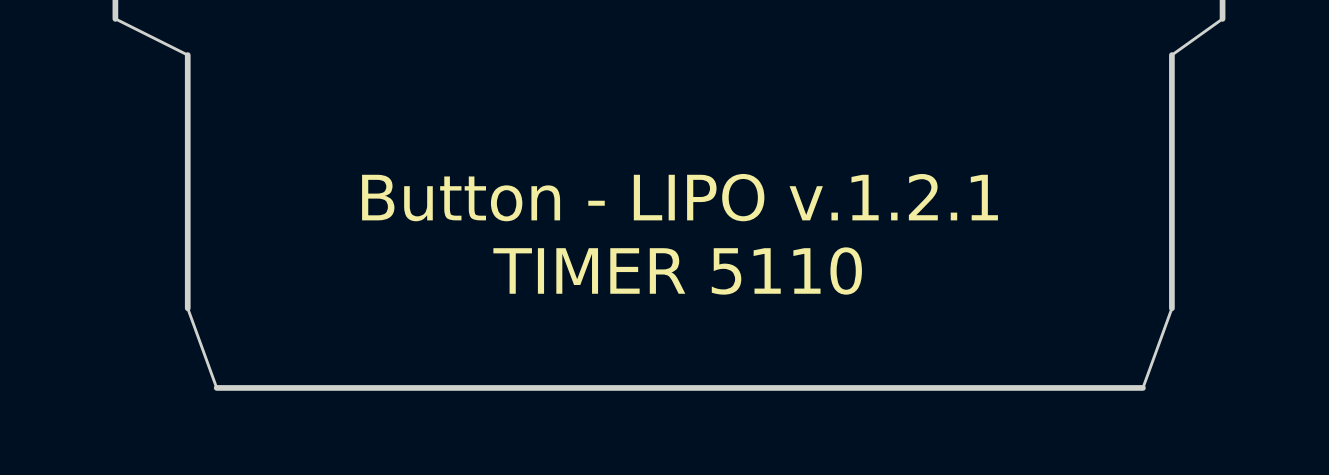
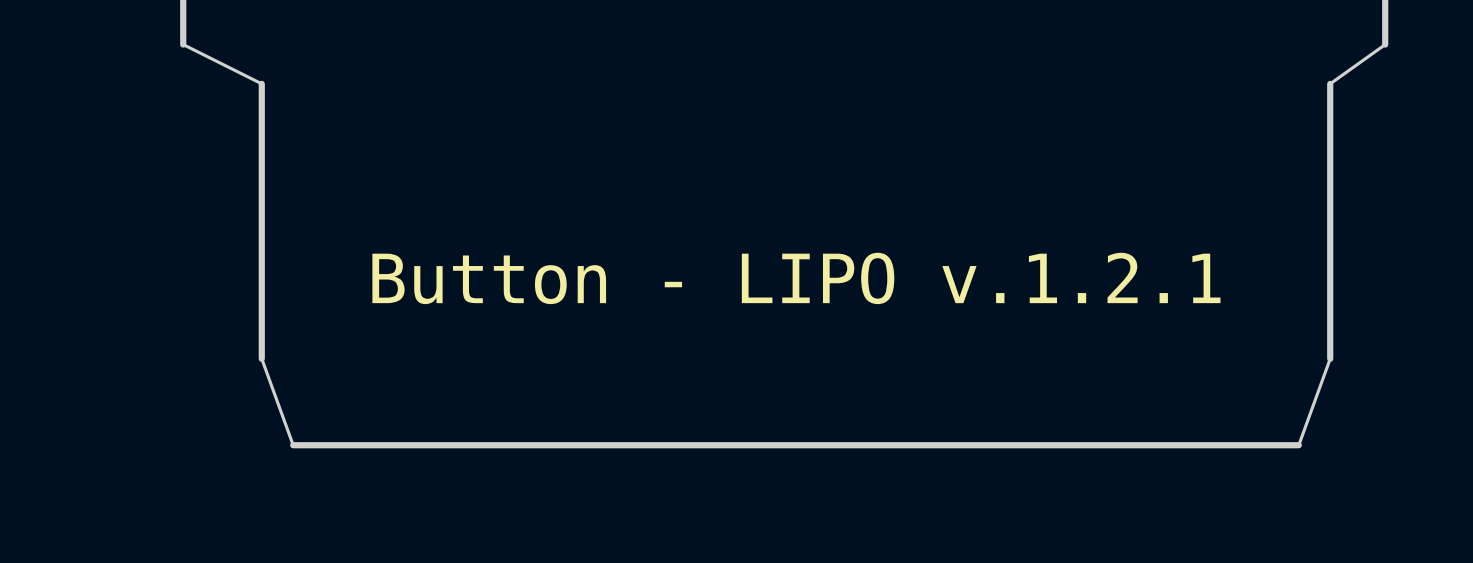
text position: Button - LIPO v.1.2.1 (680, 197) -> Button - LIPO v.1.2.1 (796, 278)
text: TIMER 5110 (677, 271) -> none

